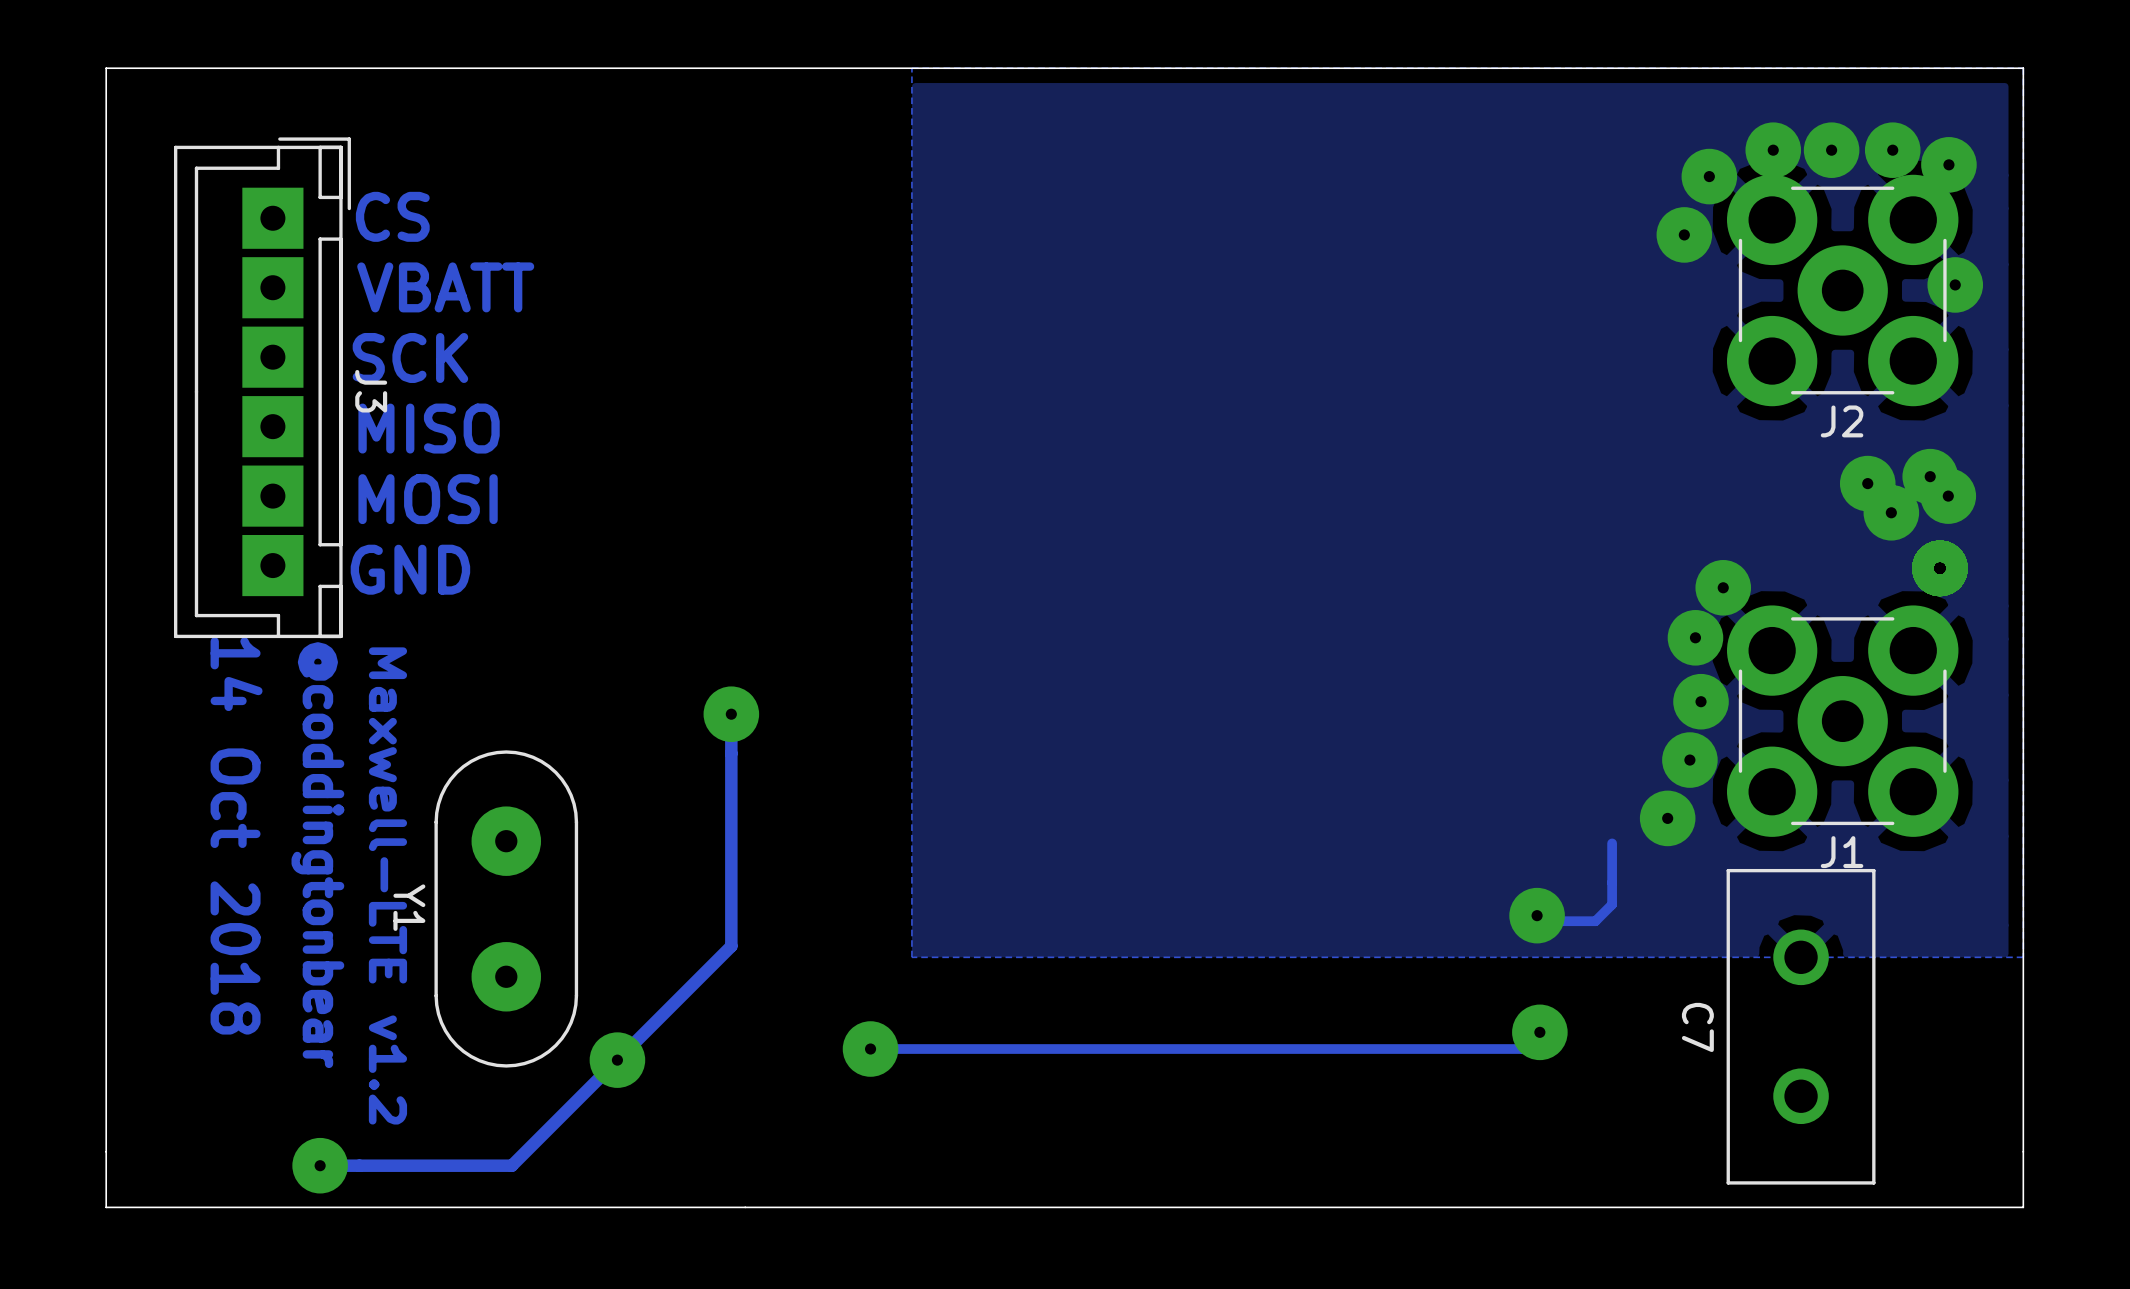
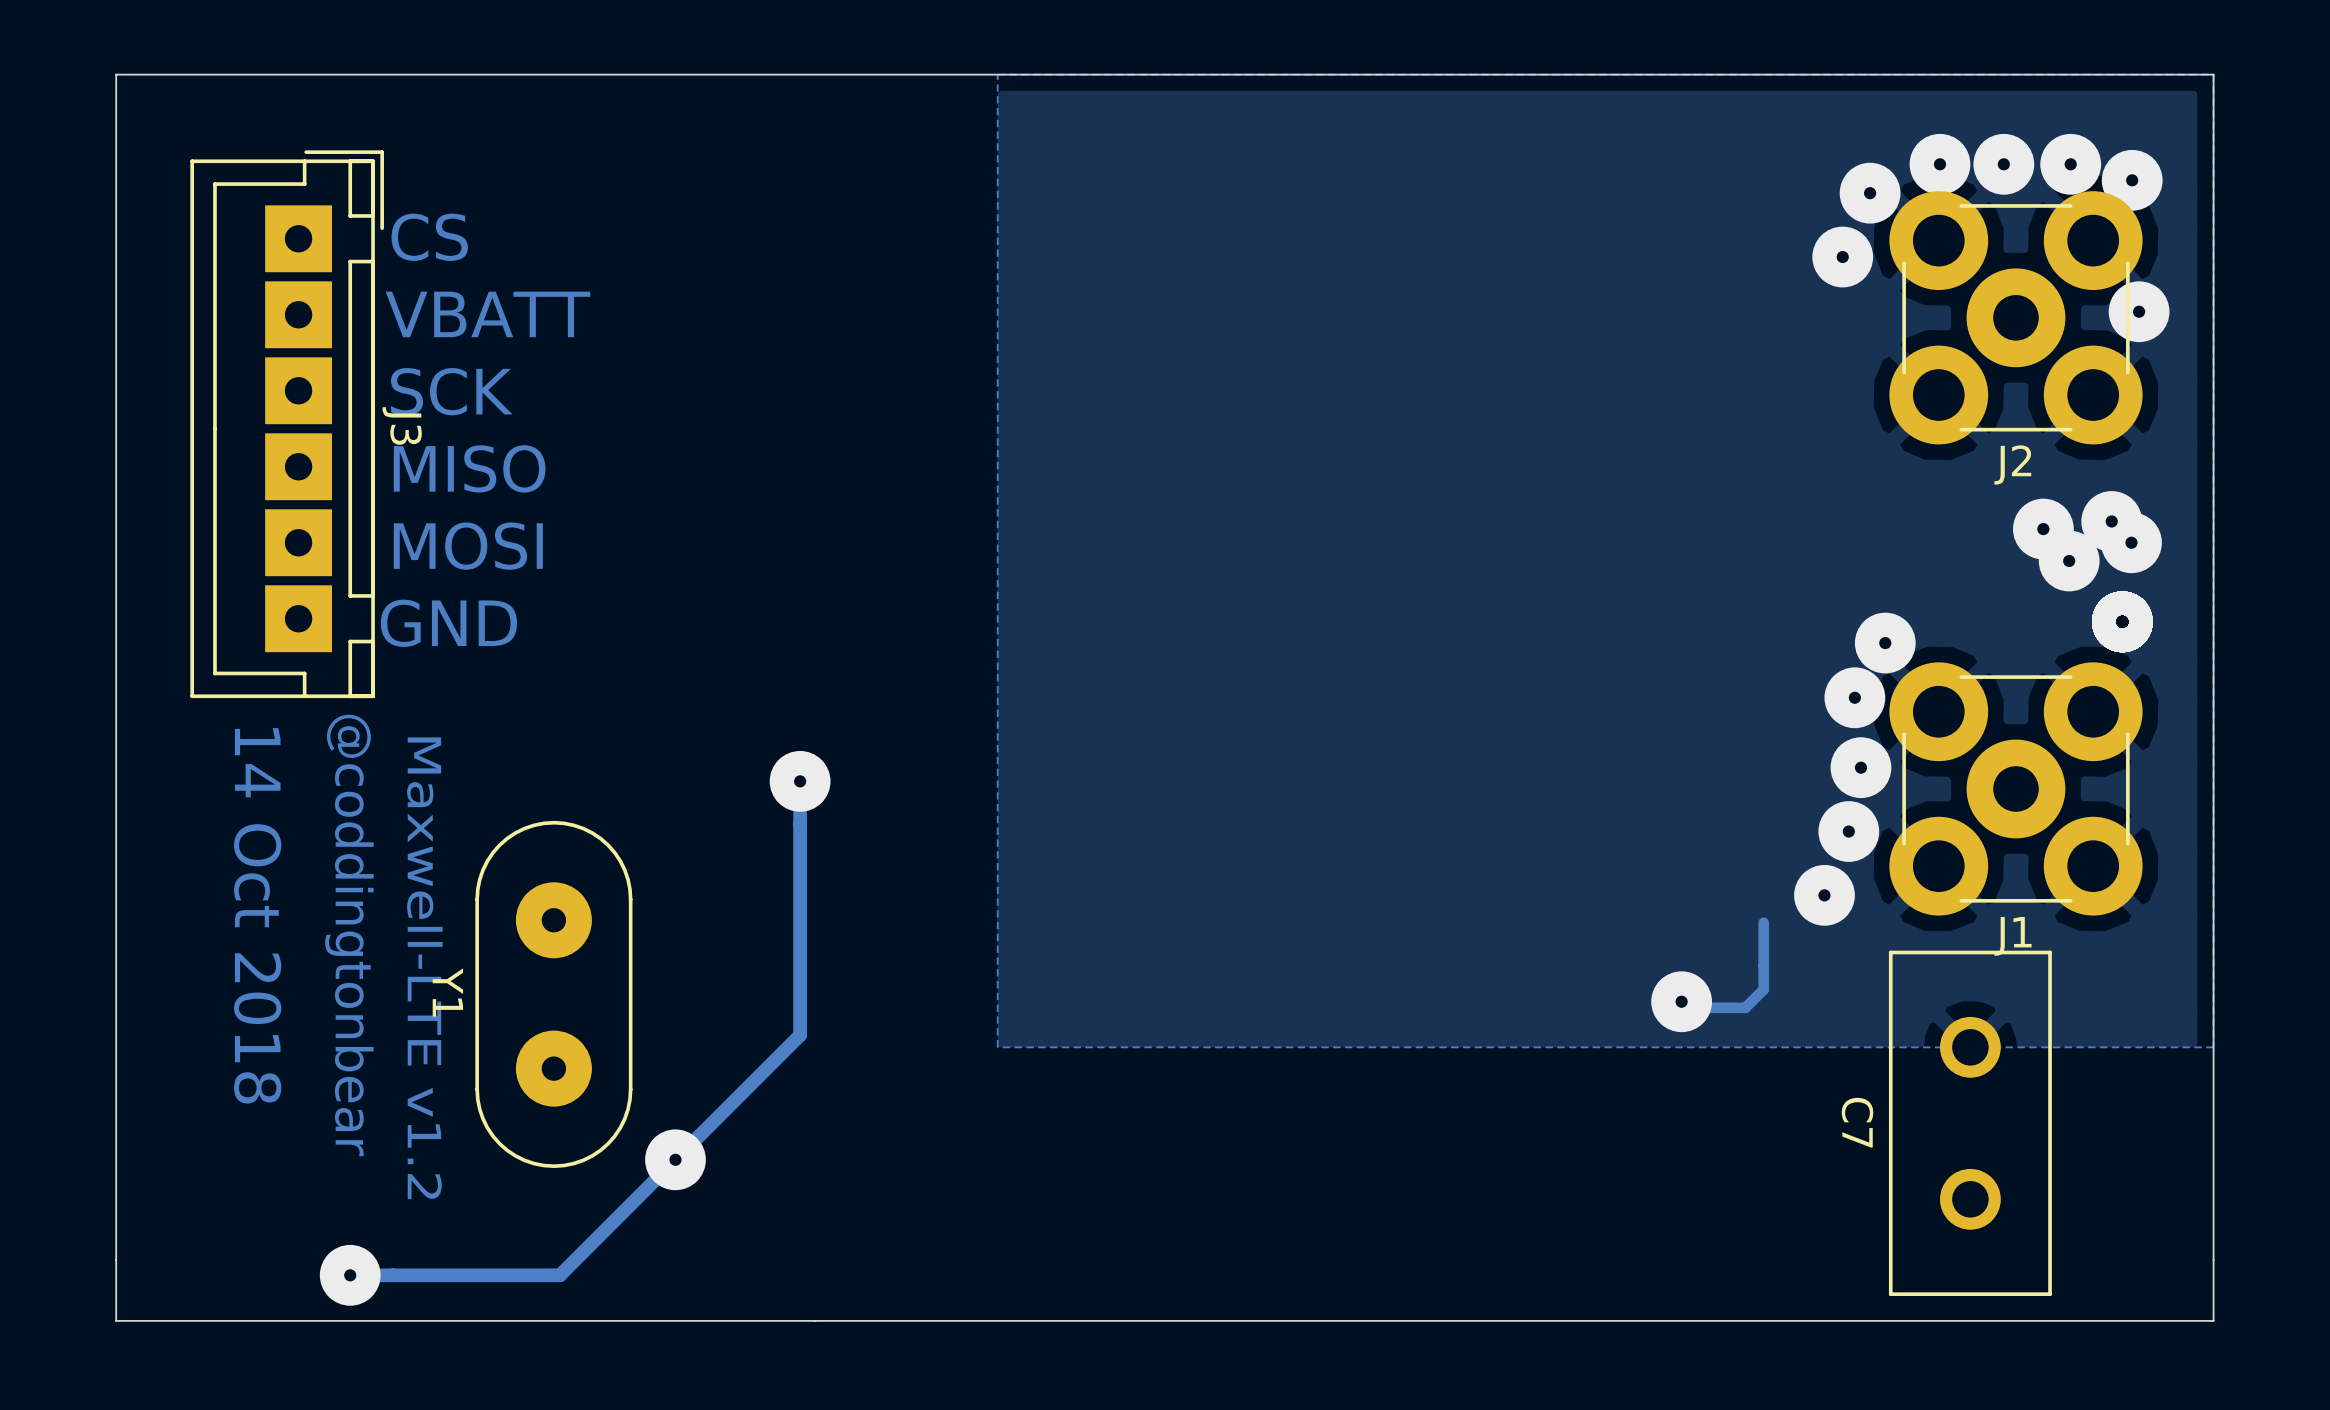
track: (1539, 1032) (1523, 1049) (870, 1049) -> none
via: (1539, 1032) -> none
via: (870, 1049) -> none

